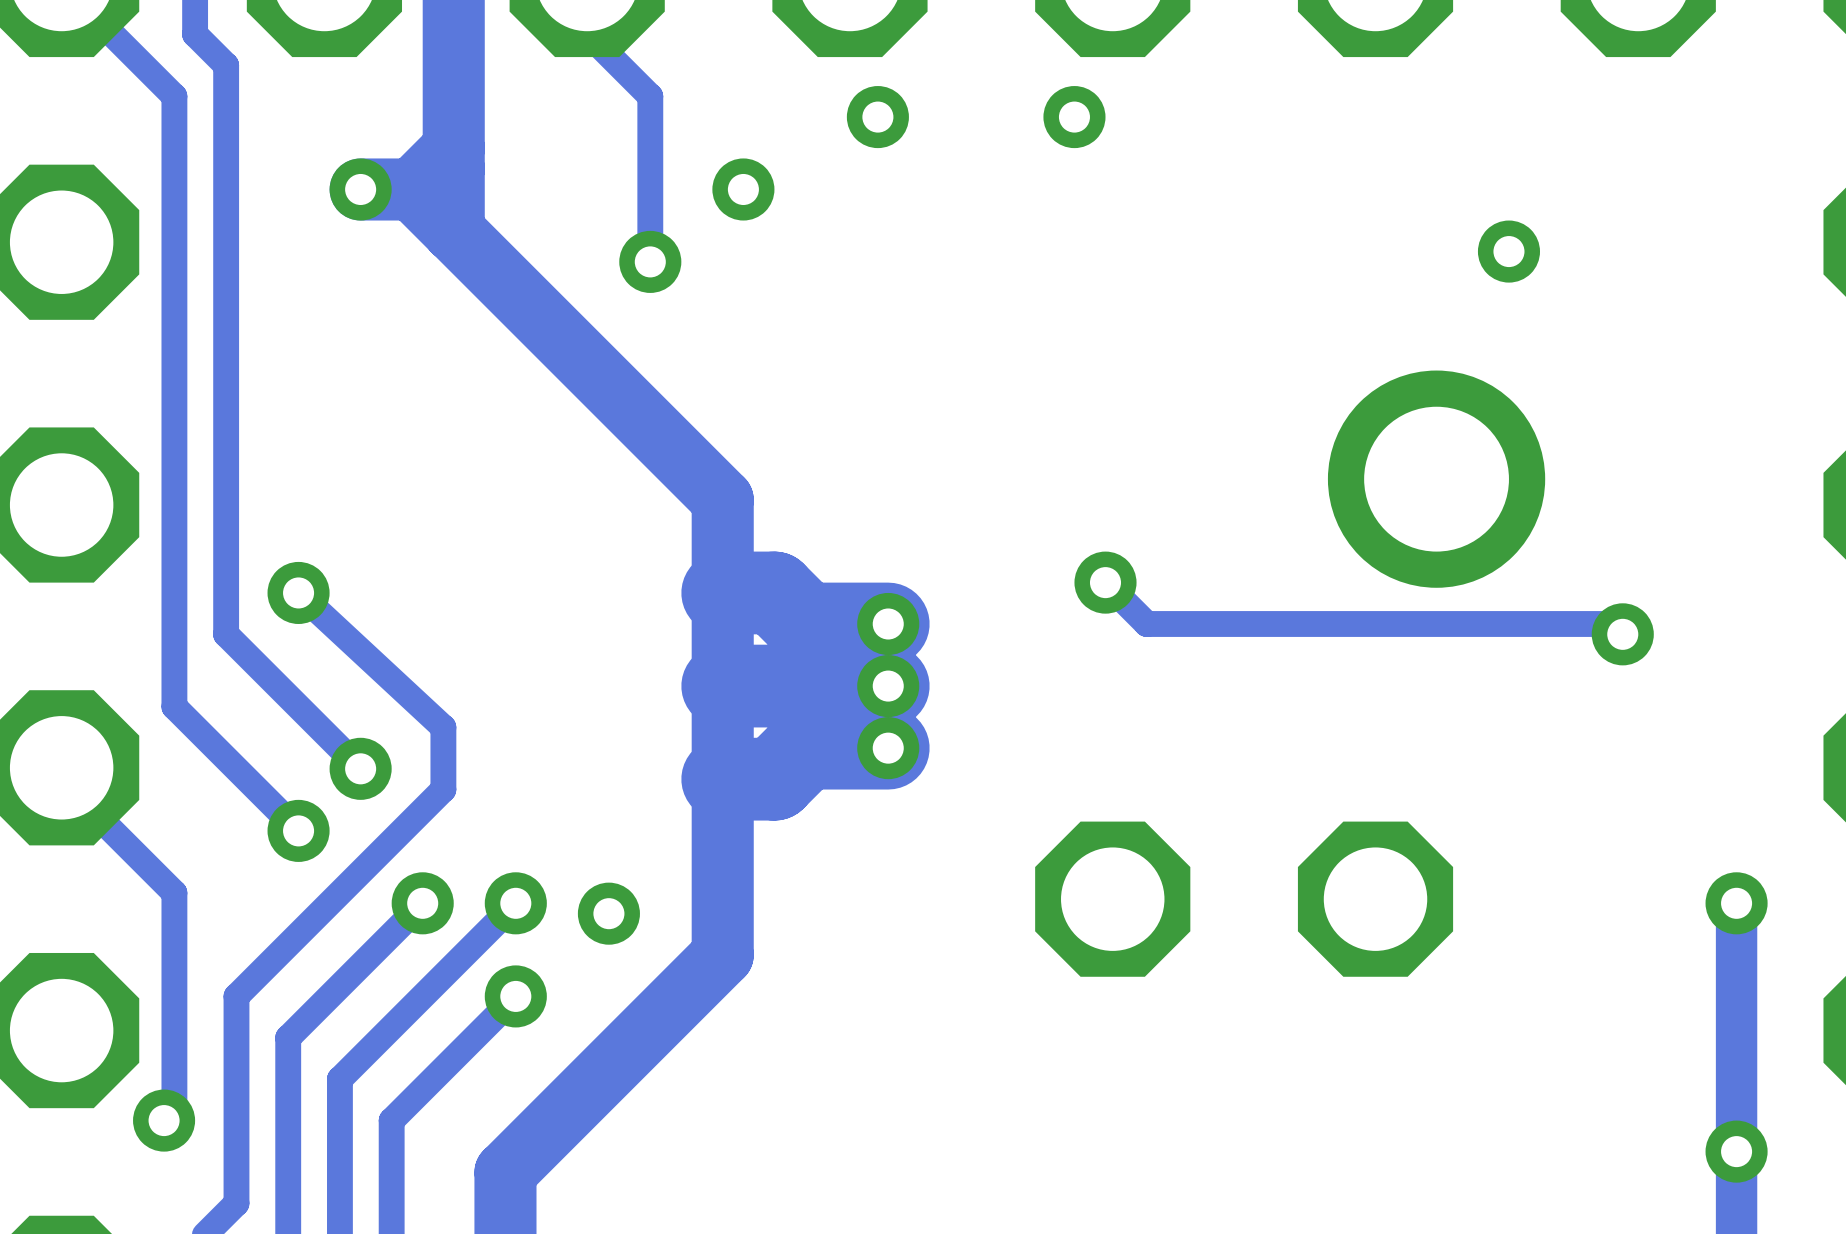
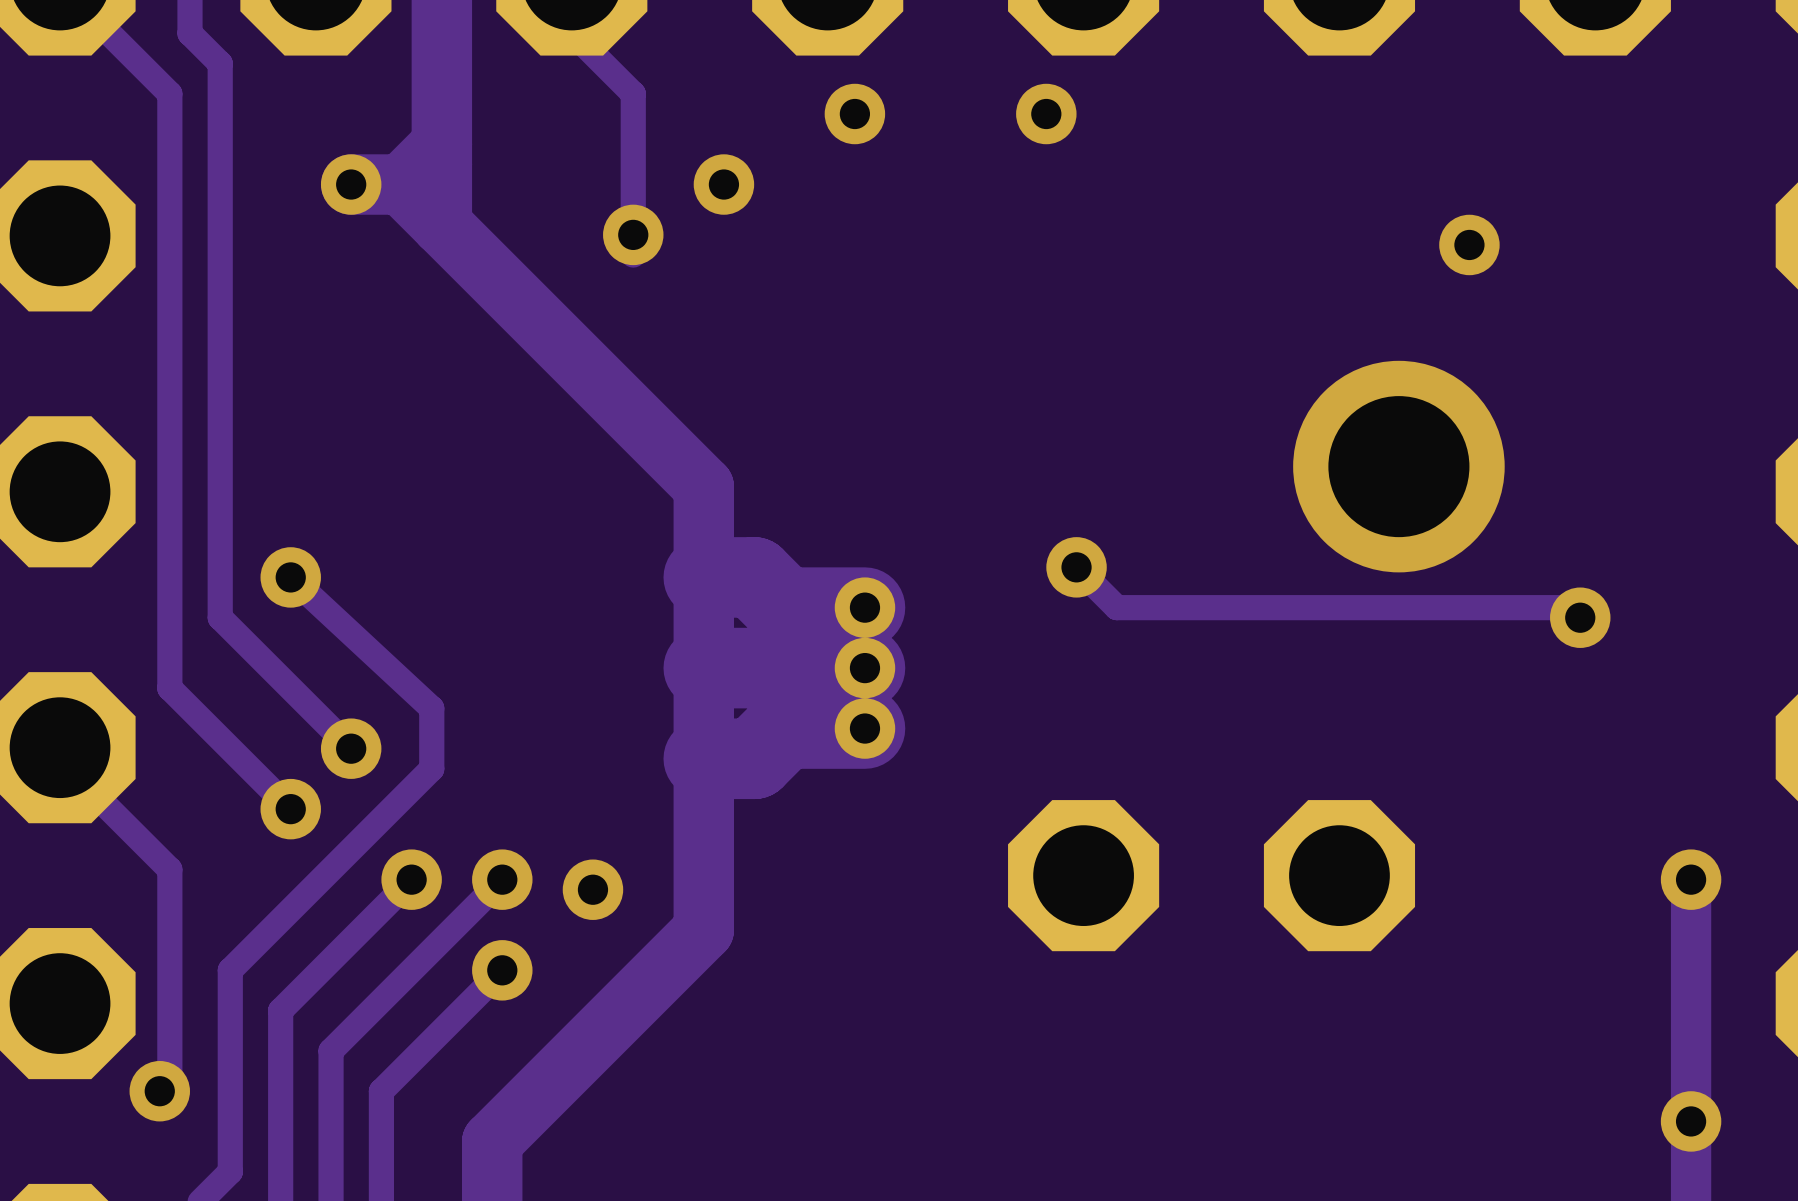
via position: (650, 261) -> (633, 234)

